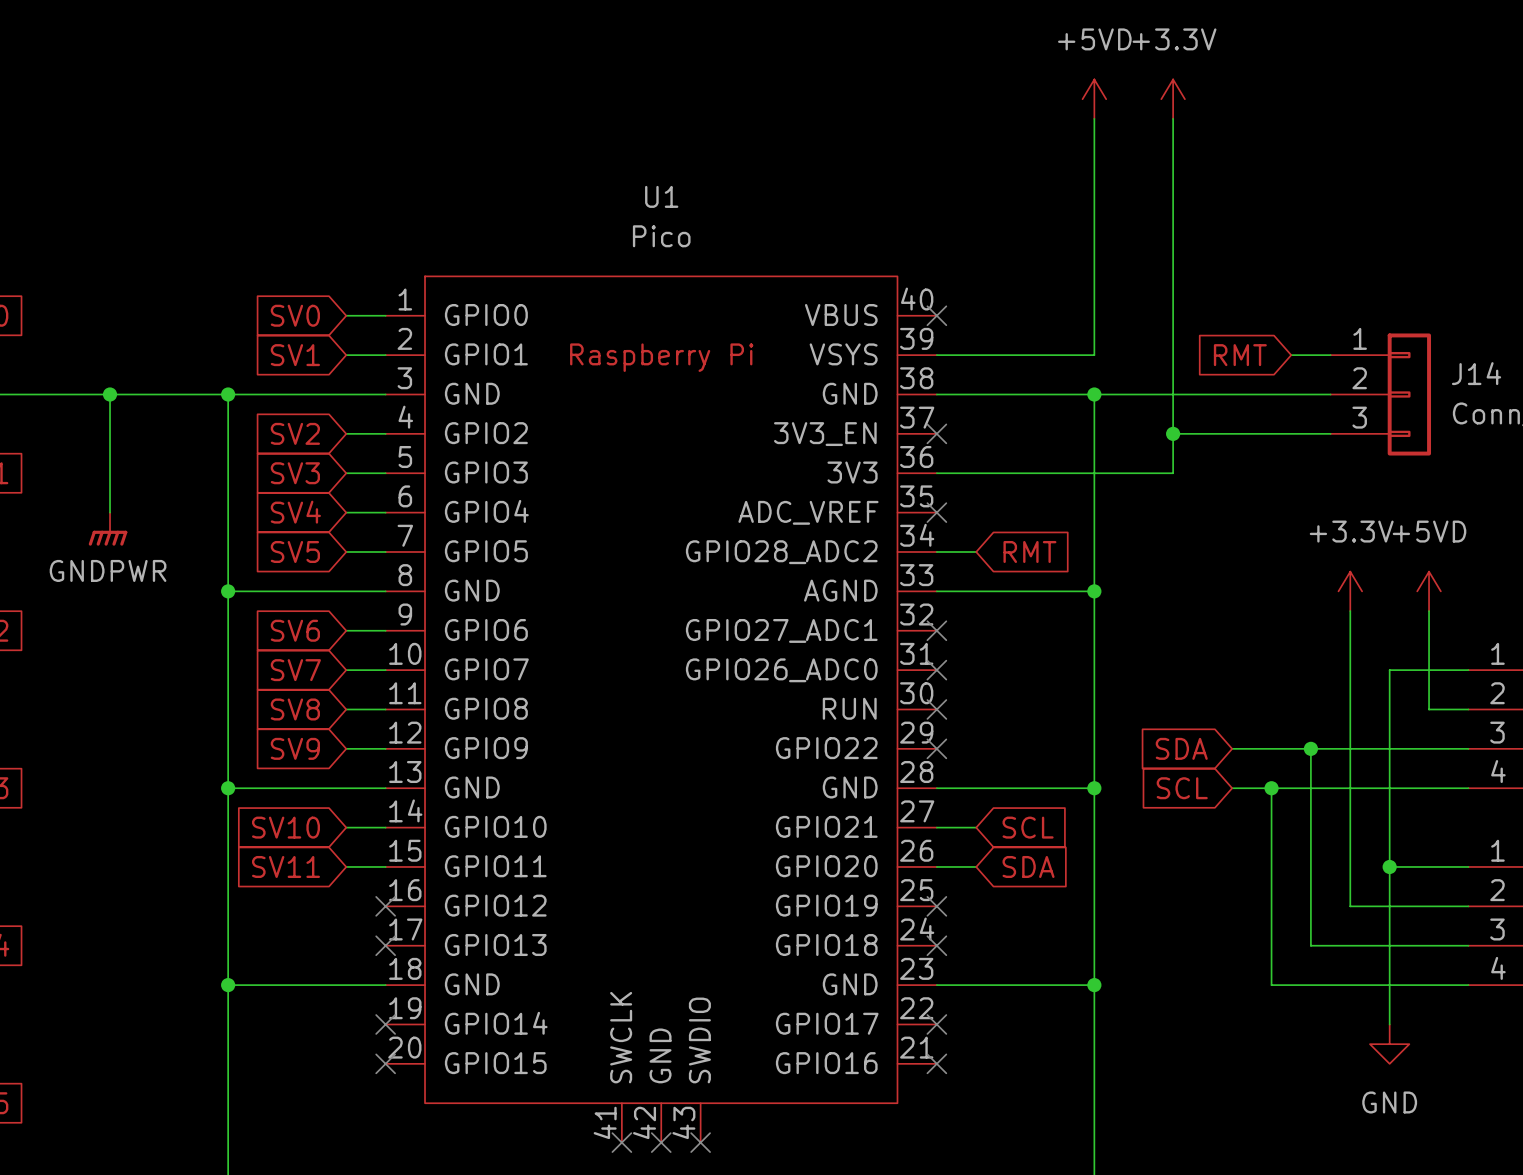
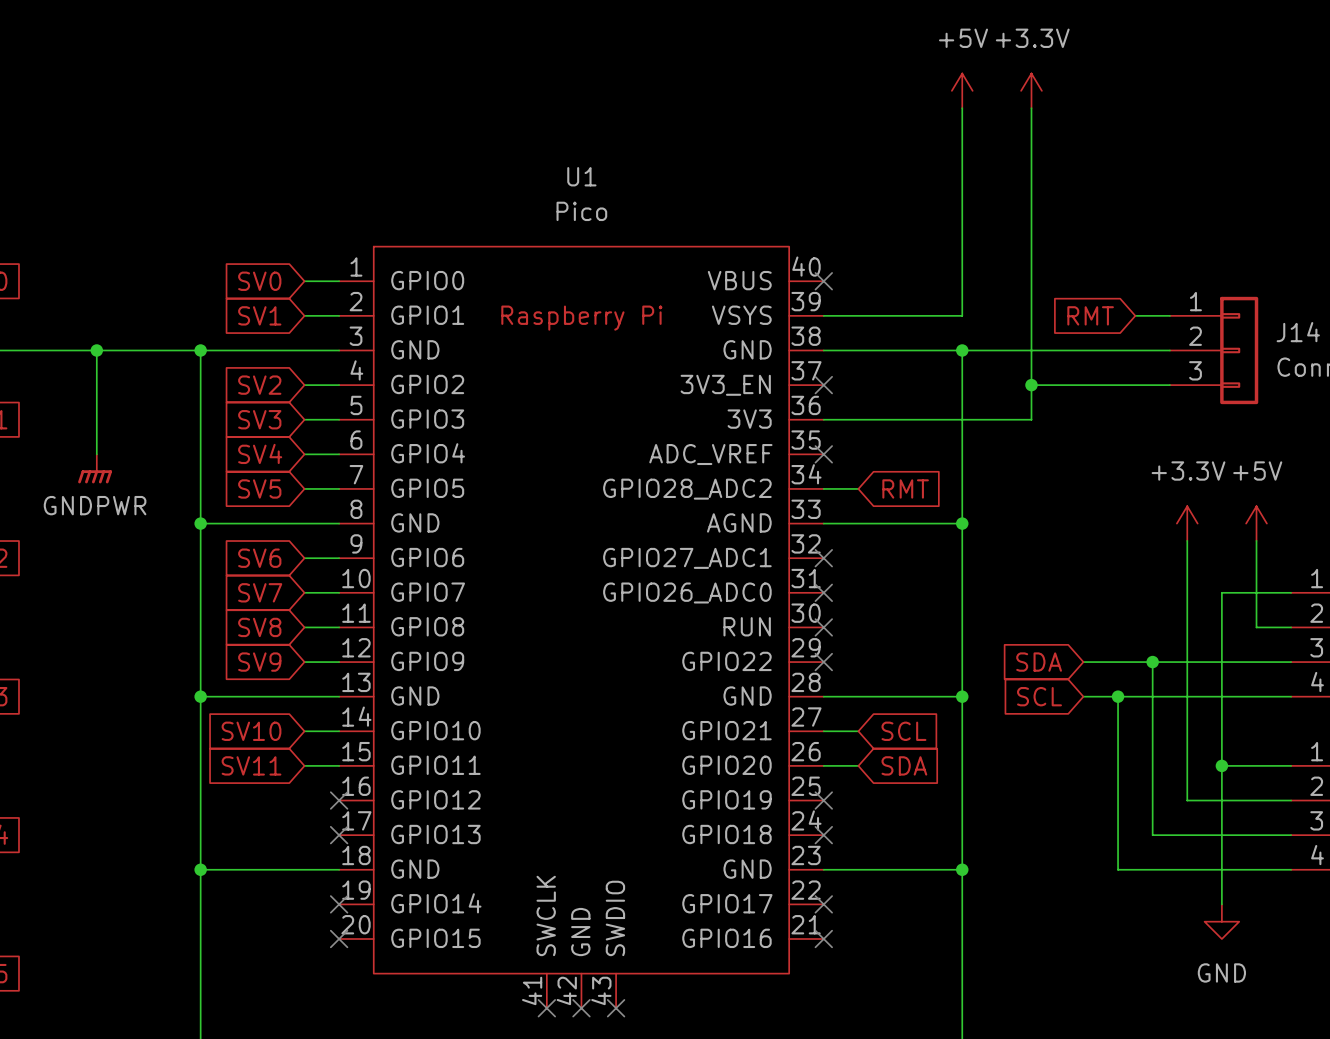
power symbol: +5VD (1094, 99) -> +5V (962, 90)
power symbol: +5VD (1429, 591) -> +5V (1256, 523)

